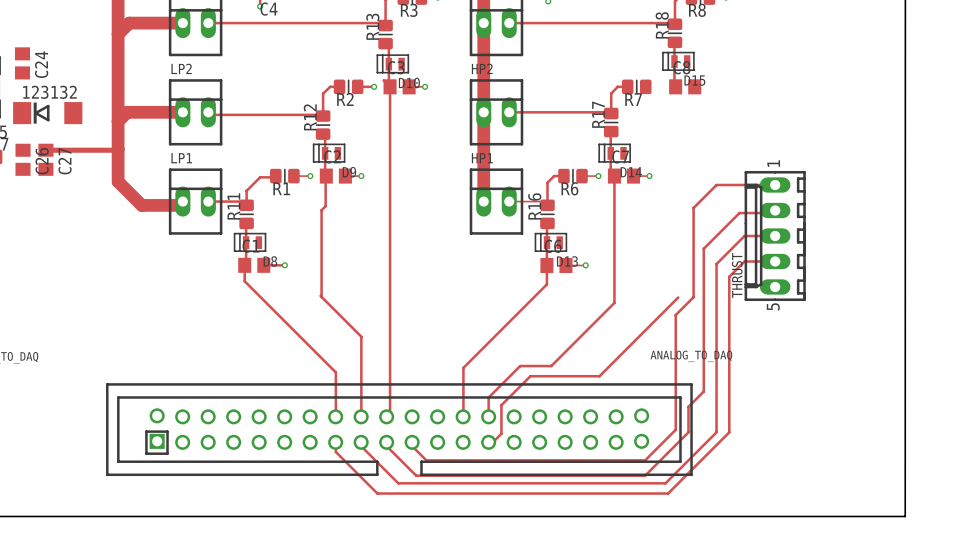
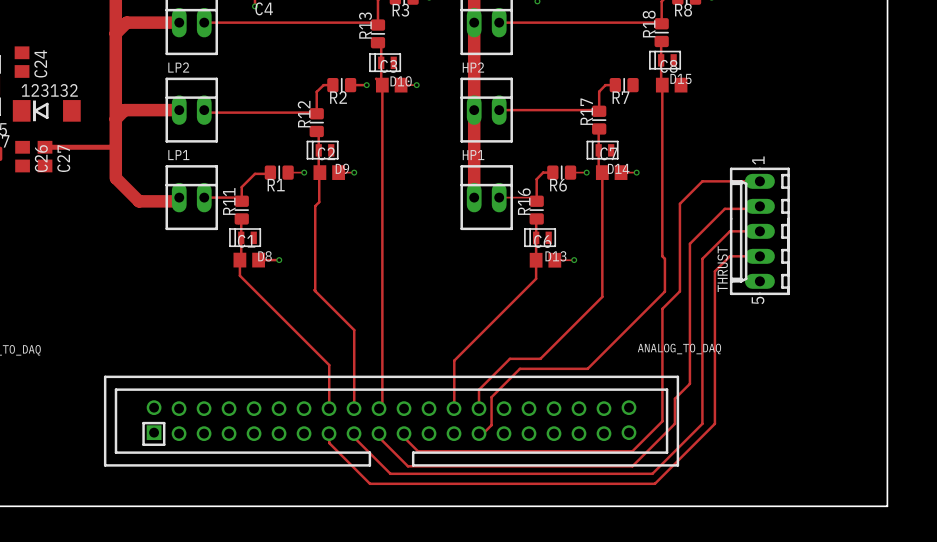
track: none -> (662, 85) (662, 256) (664, 258) (664, 291)

